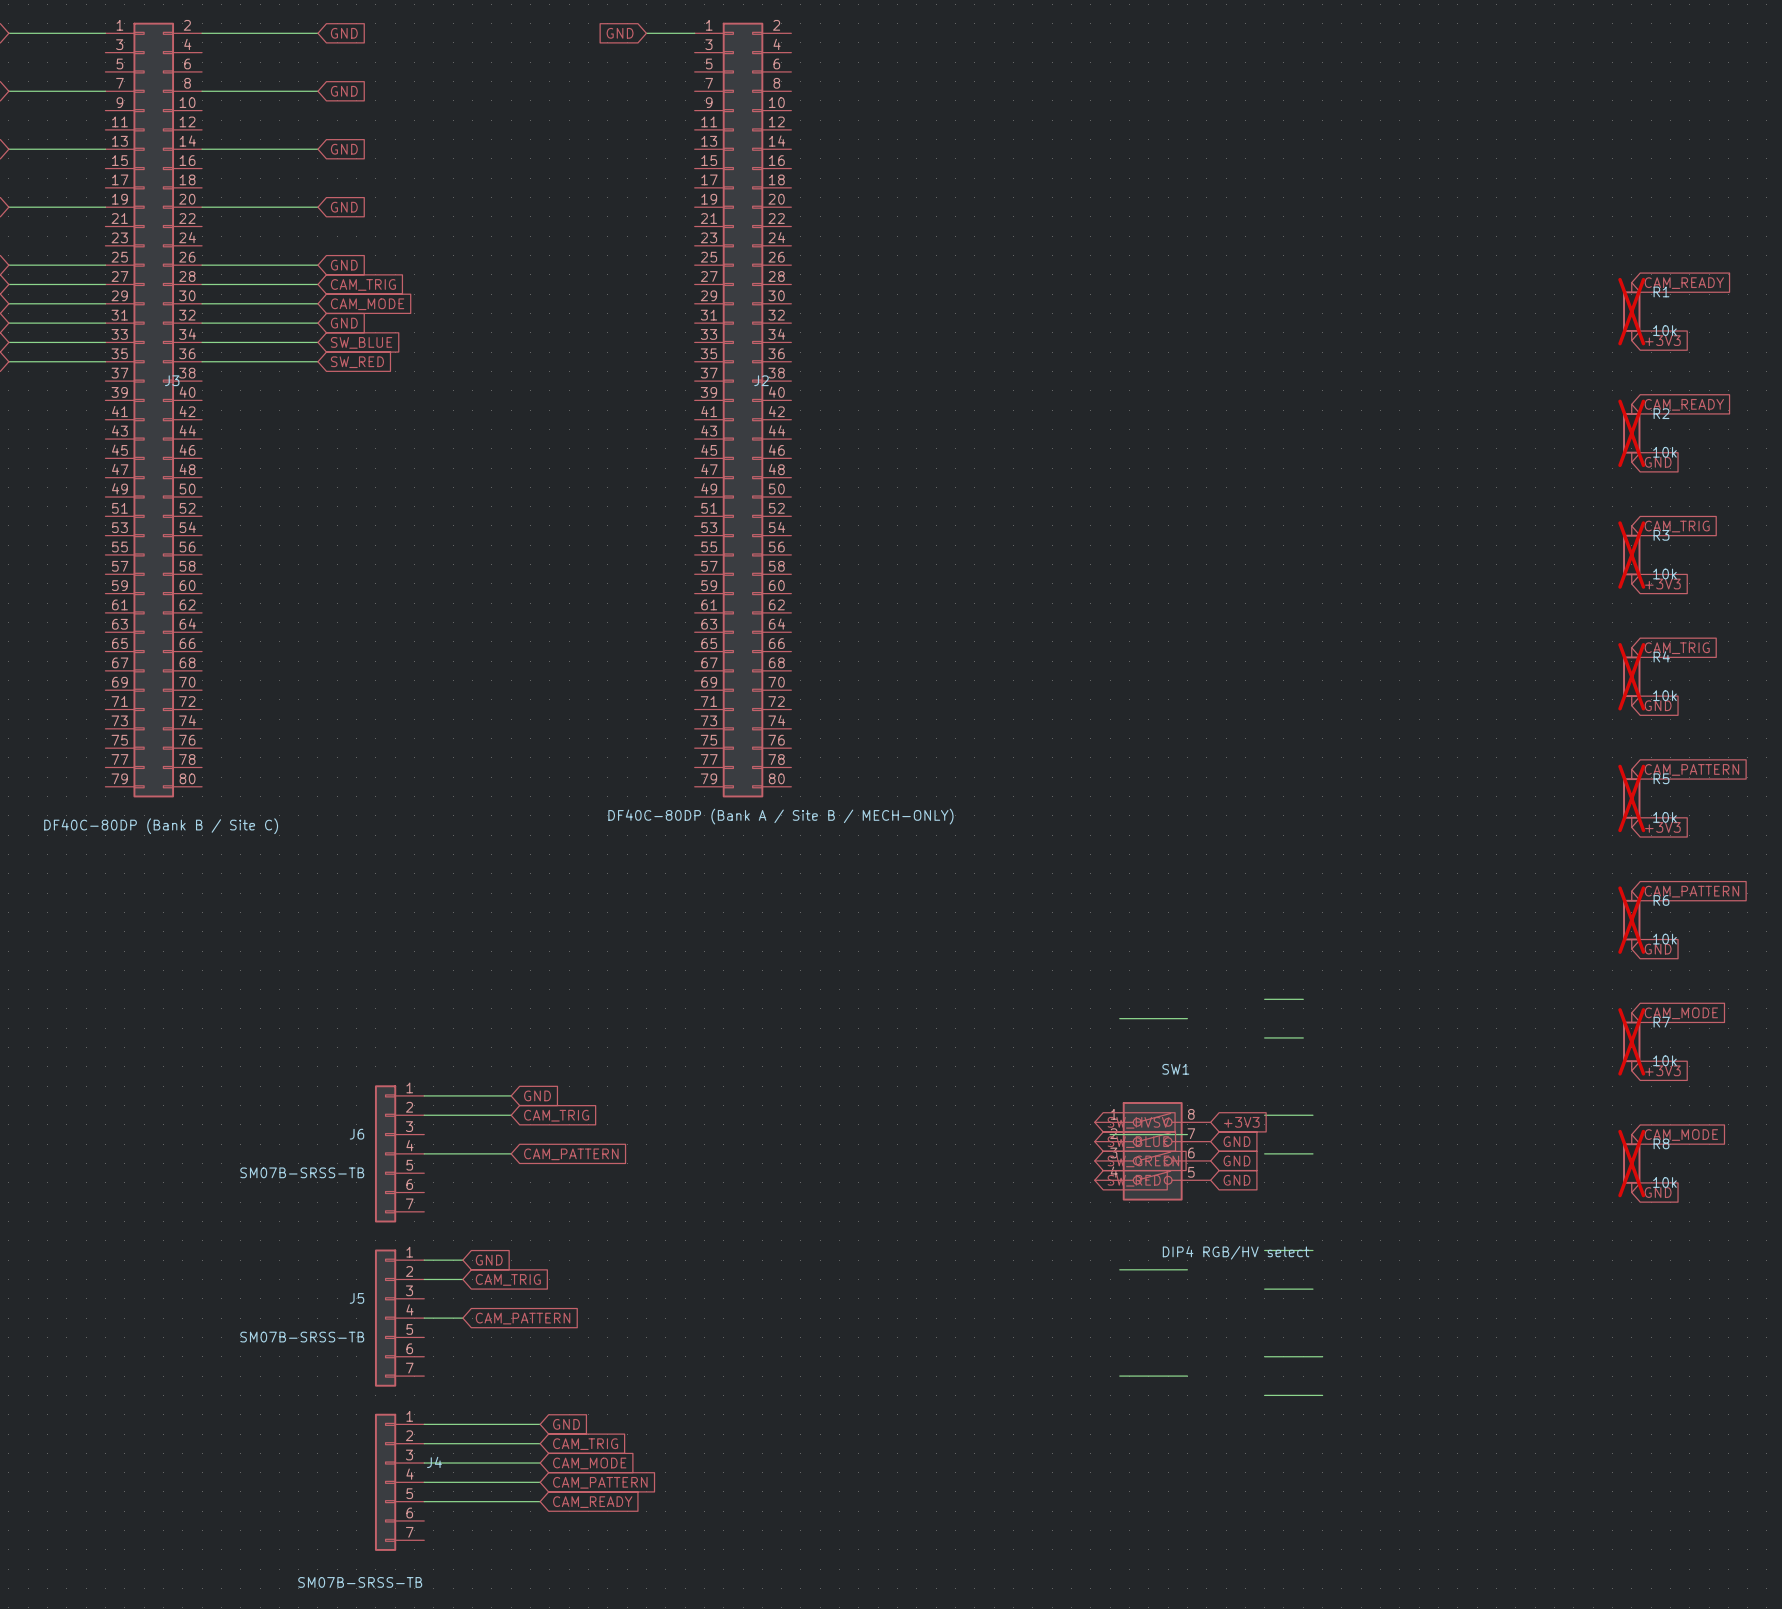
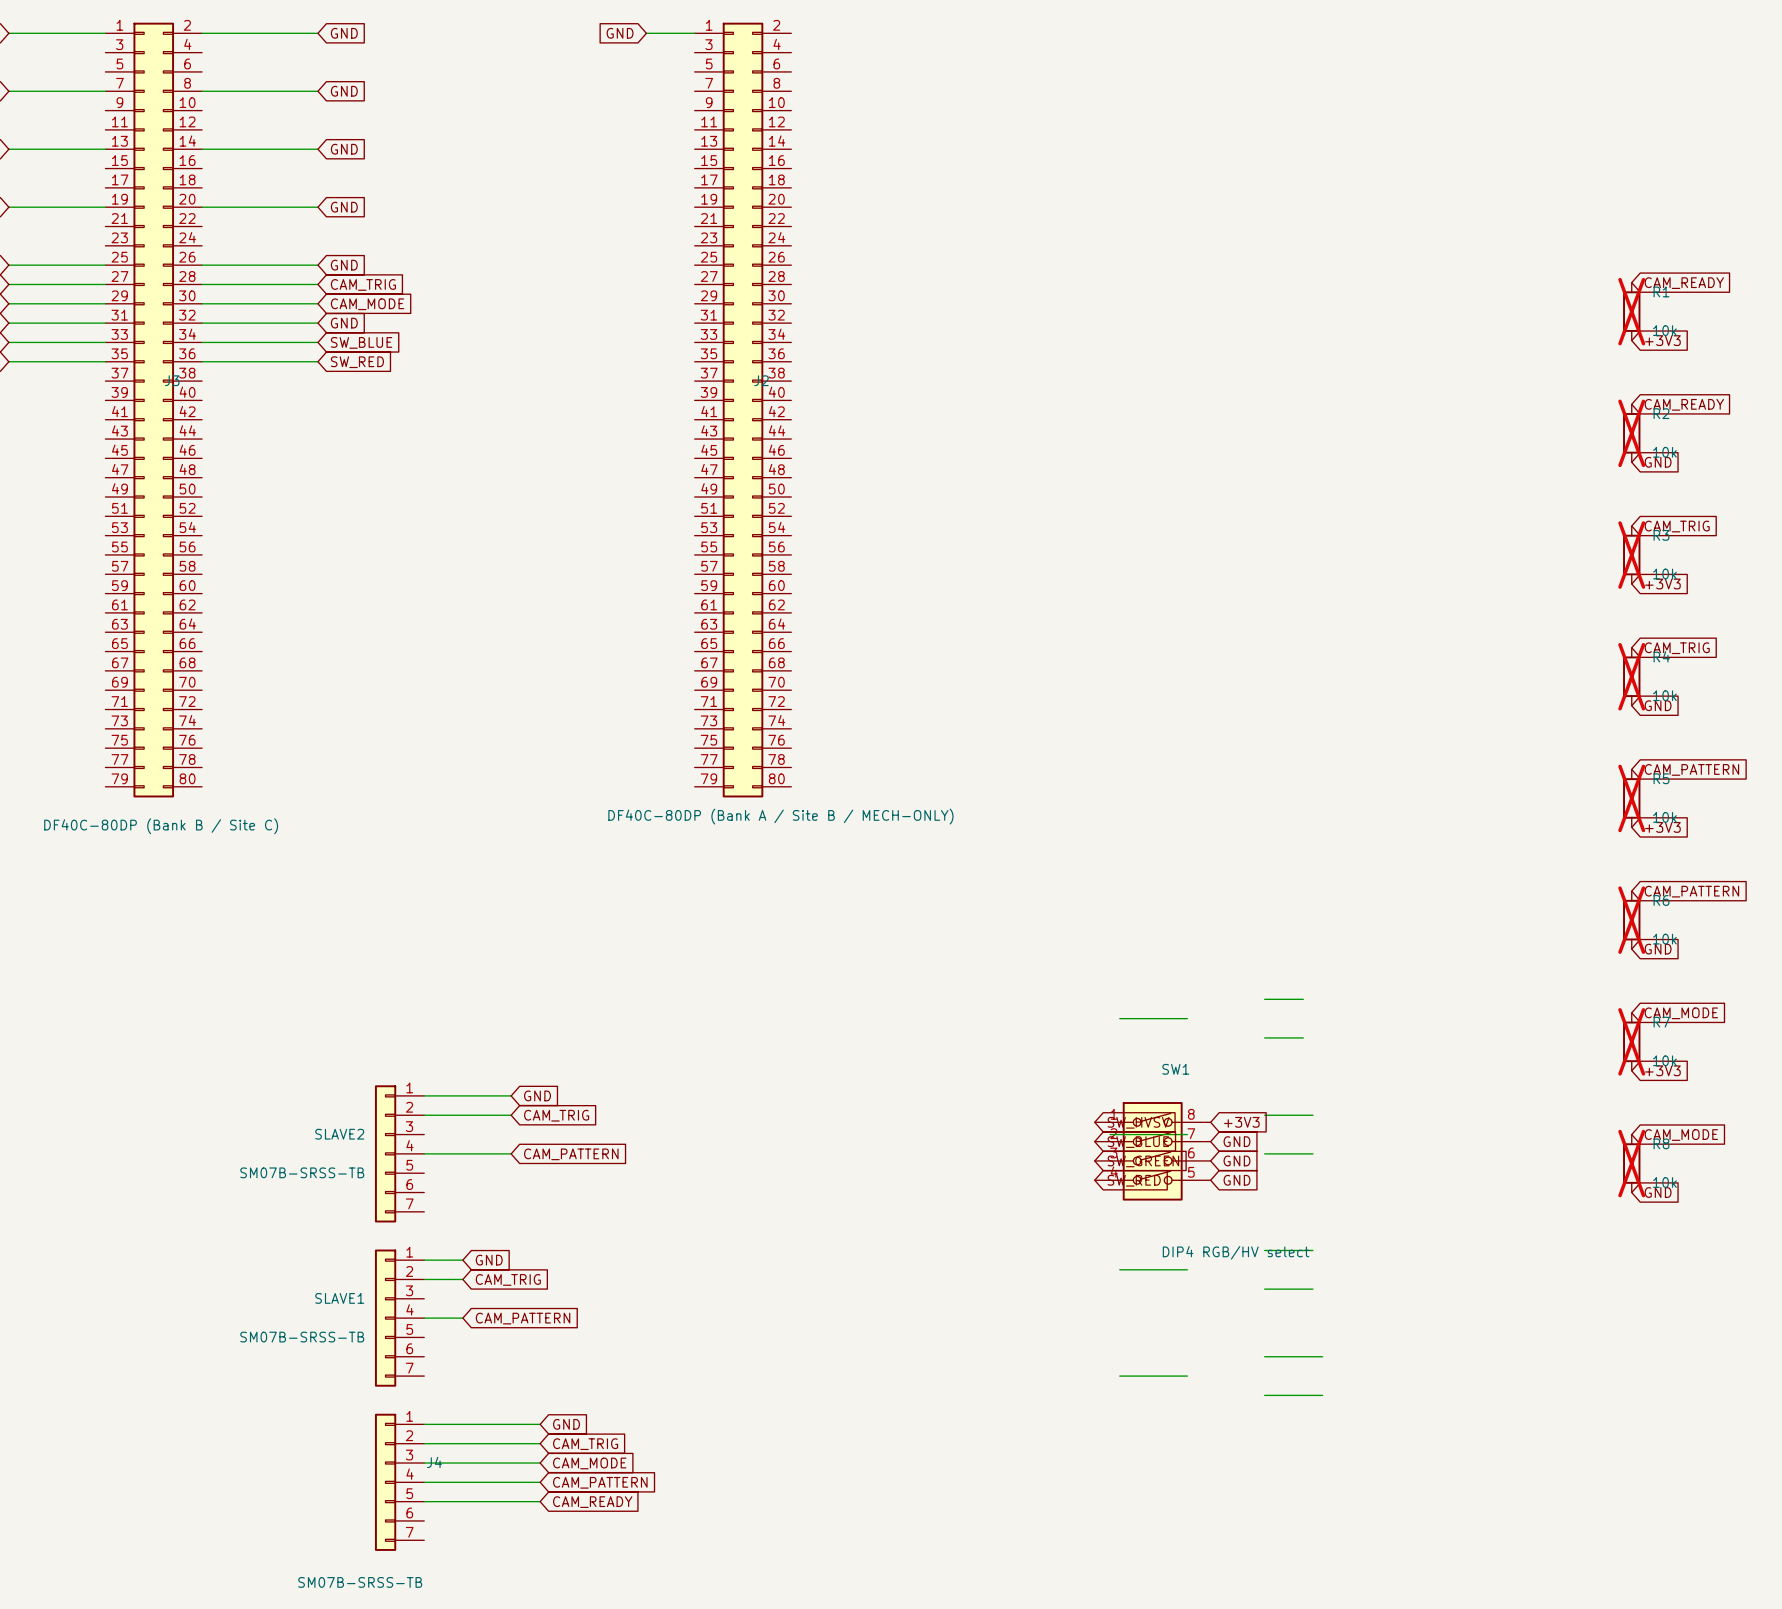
J6 name: J6 (356, 1134) -> SLAVE2 (339, 1134)
J5 name: J5 (356, 1298) -> SLAVE1 (339, 1298)

